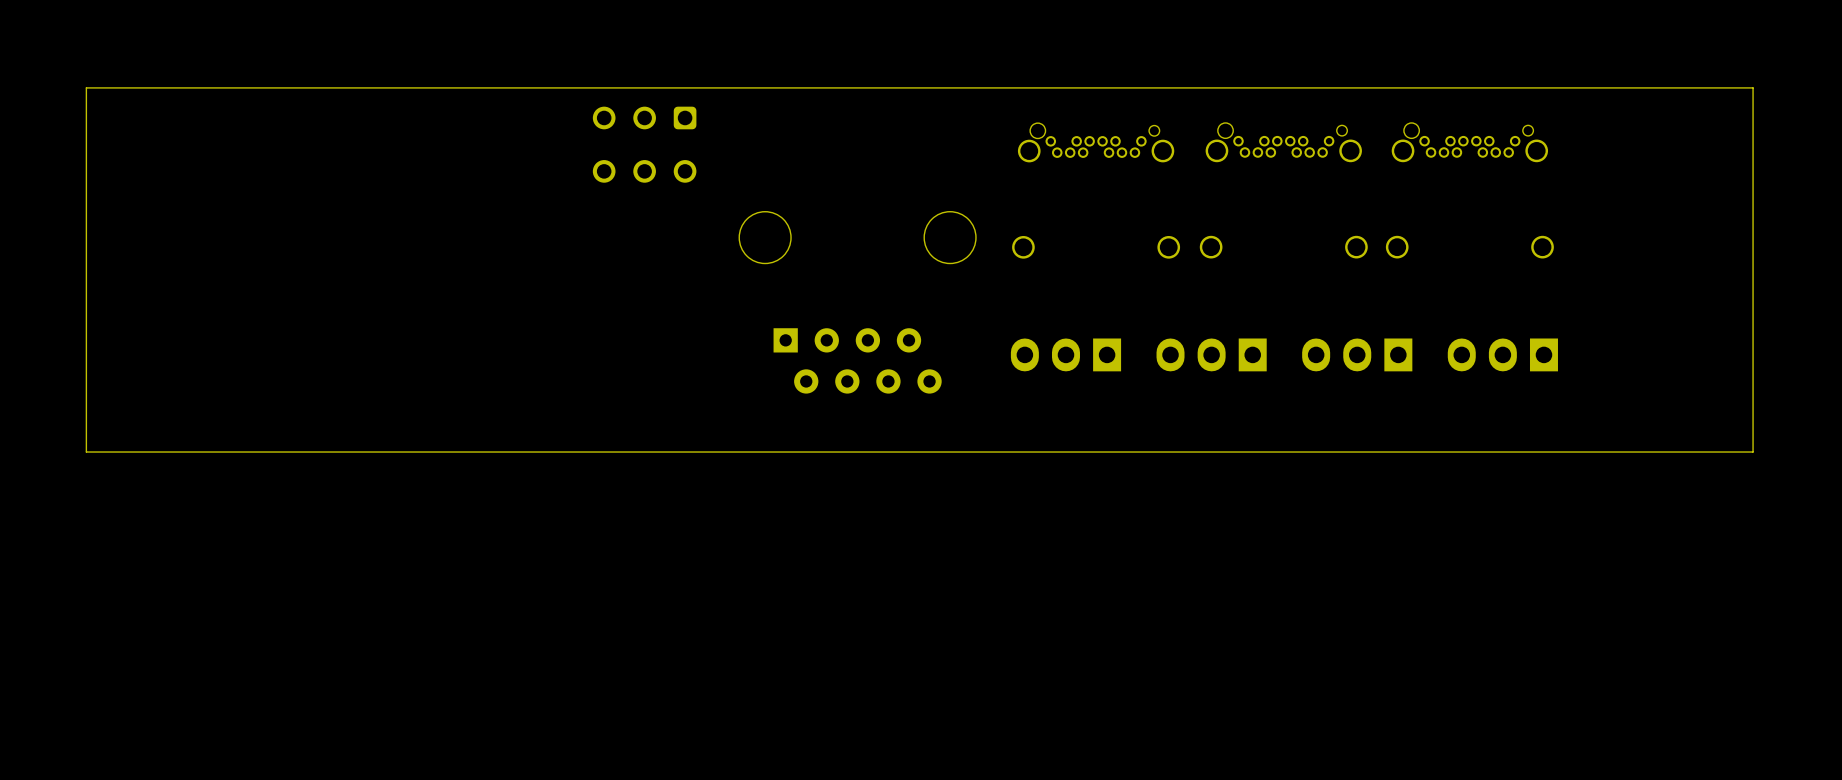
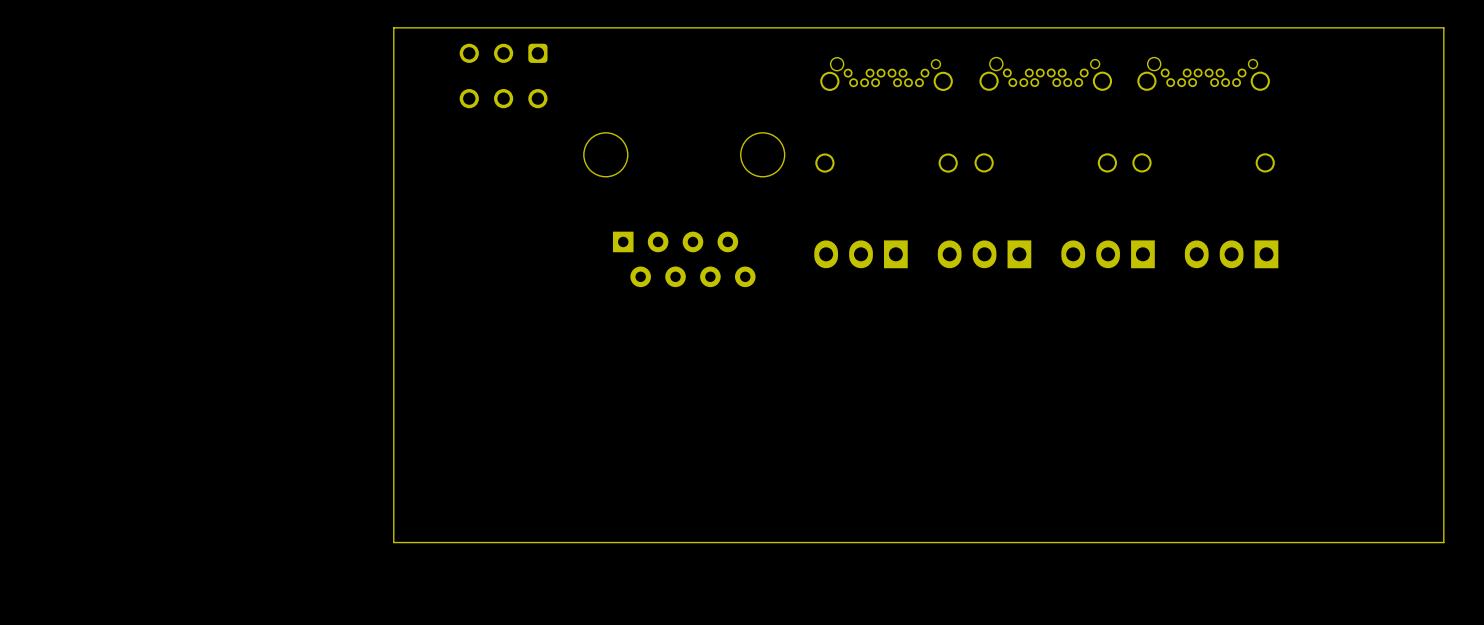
board edge: (515, 87) (86, 87) (86, 452) (1753, 452) -> (393, 27) (393, 542) (1443, 542) (1443, 336)

